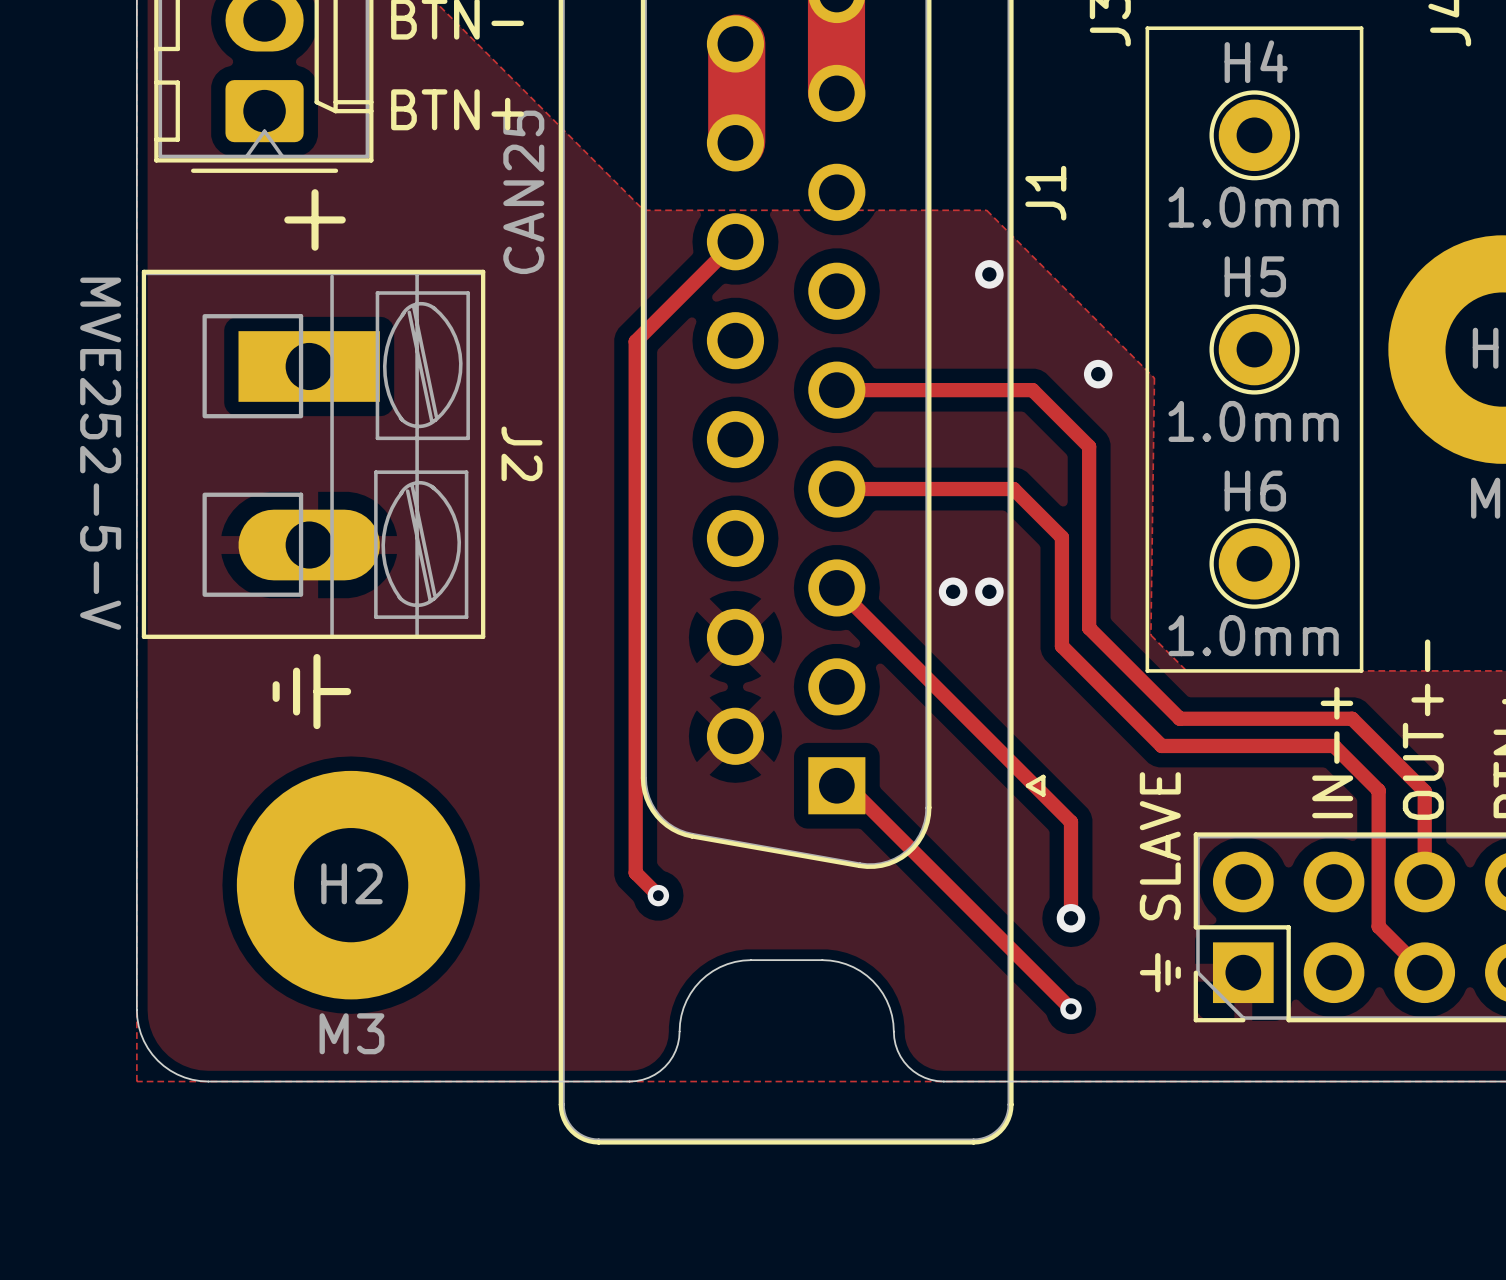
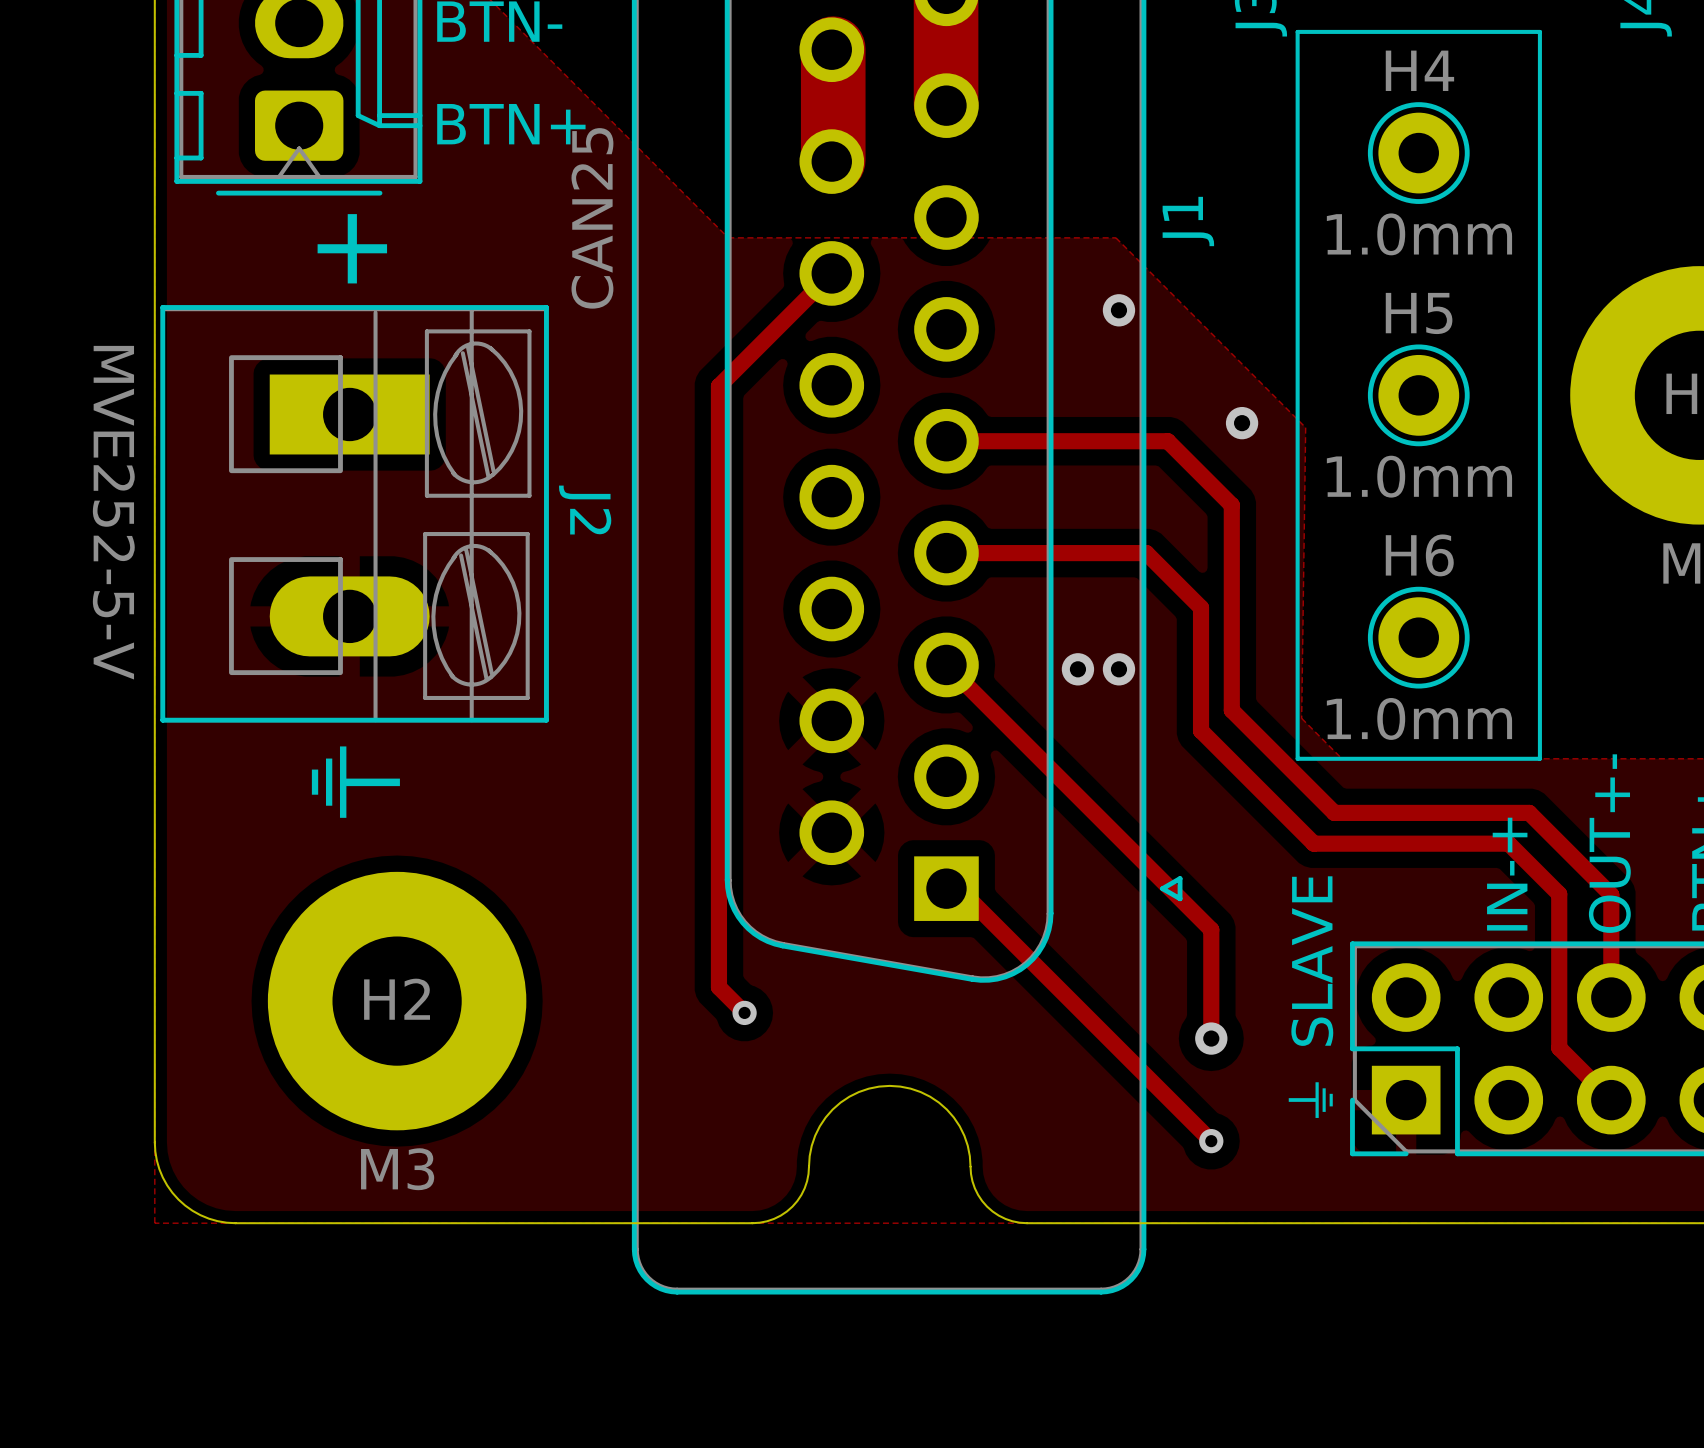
board edge: (629, 1081) (642, 1079) (654, 1074) (669, 1061) (677, 1044) (683, 1007) (690, 993) (700, 981) (713, 971) (727, 964) (751, 960) (830, 960) (846, 964) (860, 971) (872, 981) (886, 1000) (892, 1015) (895, 1044) (904, 1061) (913, 1071) (924, 1077) (943, 1081) -> (712, 1223) (759, 1222) (774, 1218) (786, 1211) (797, 1201) (804, 1188) (811, 1145) (825, 1117) (840, 1102) (858, 1092) (889, 1085) (920, 1092) (938, 1102) (953, 1117) (967, 1145) (974, 1188) (982, 1201) (992, 1211) (1005, 1218) (1019, 1222) (1067, 1223)

